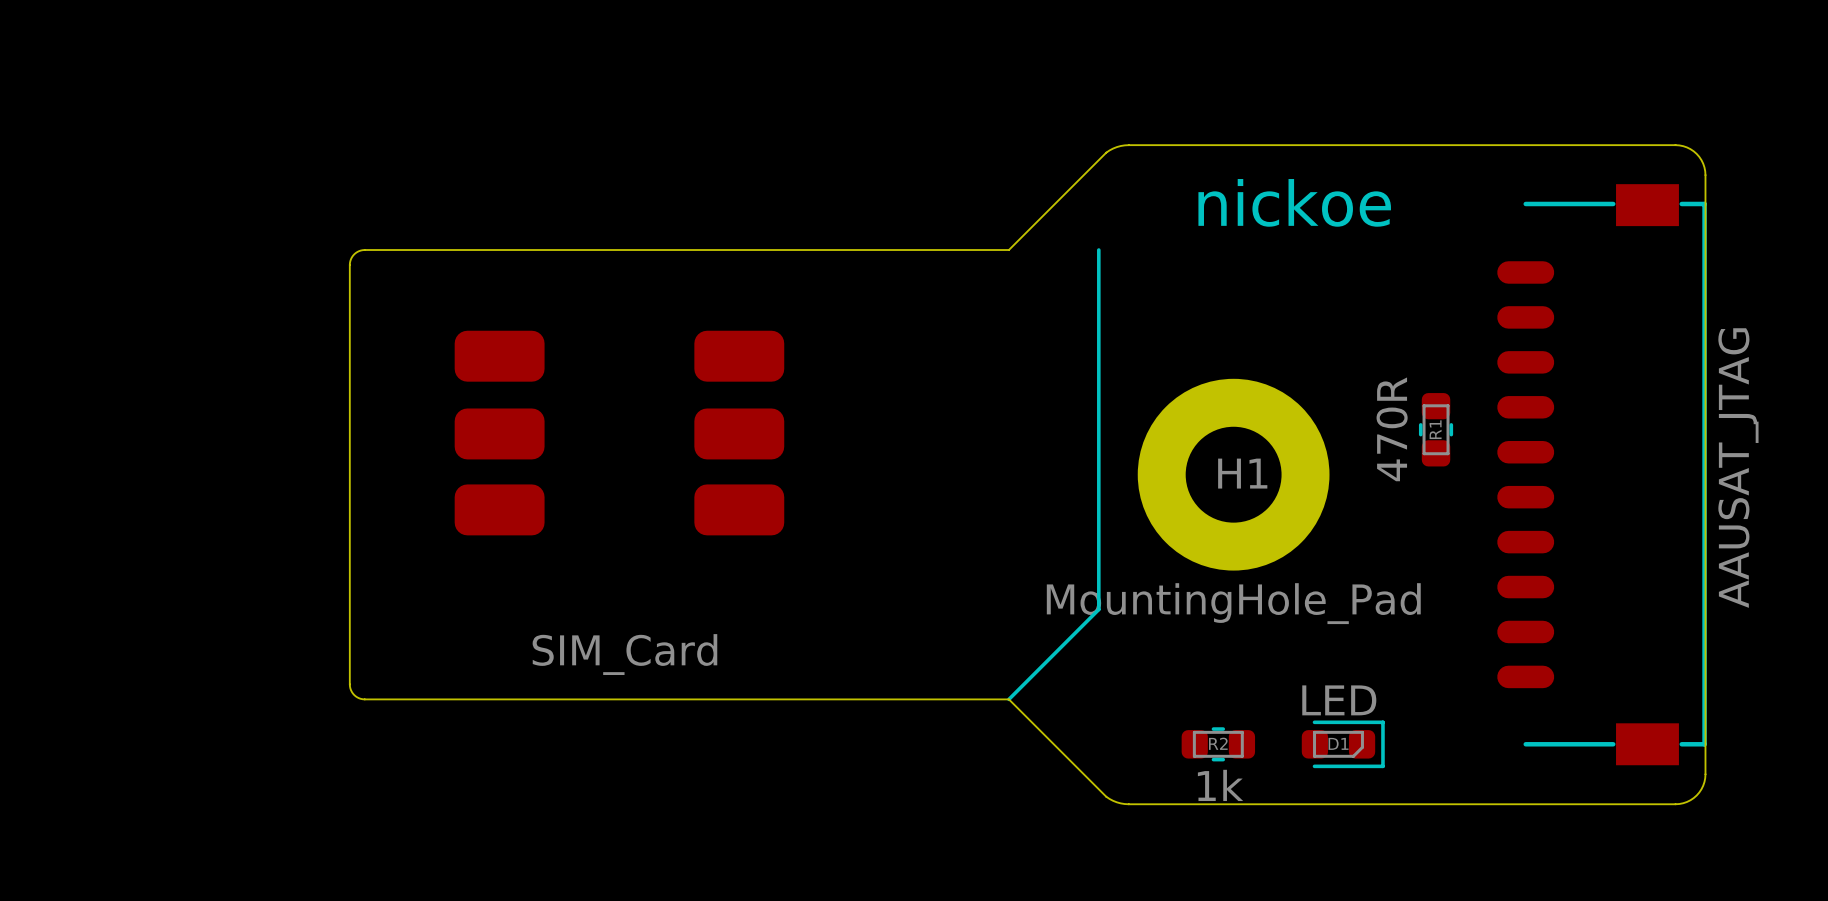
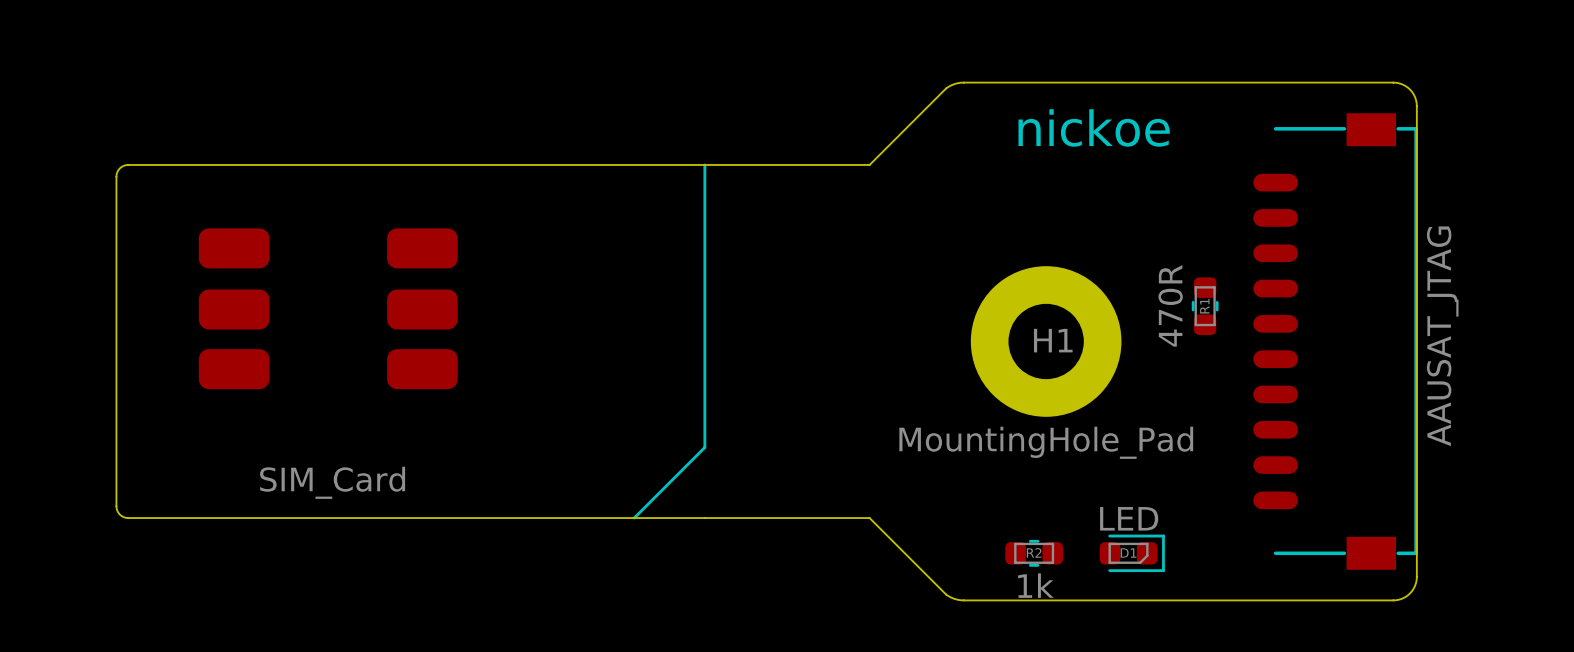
board edge: (364, 250) (354, 254) (349, 264) (349, 684) (354, 695) (364, 699) -> (363, 164) (128, 164) (119, 168) (116, 176) (116, 506) (118, 513) (128, 518) (363, 518)
line: (1098, 250) (1098, 609) (1008, 699) -> (704, 164) (704, 447) (634, 518)
part position: (619, 433) -> (328, 308)

